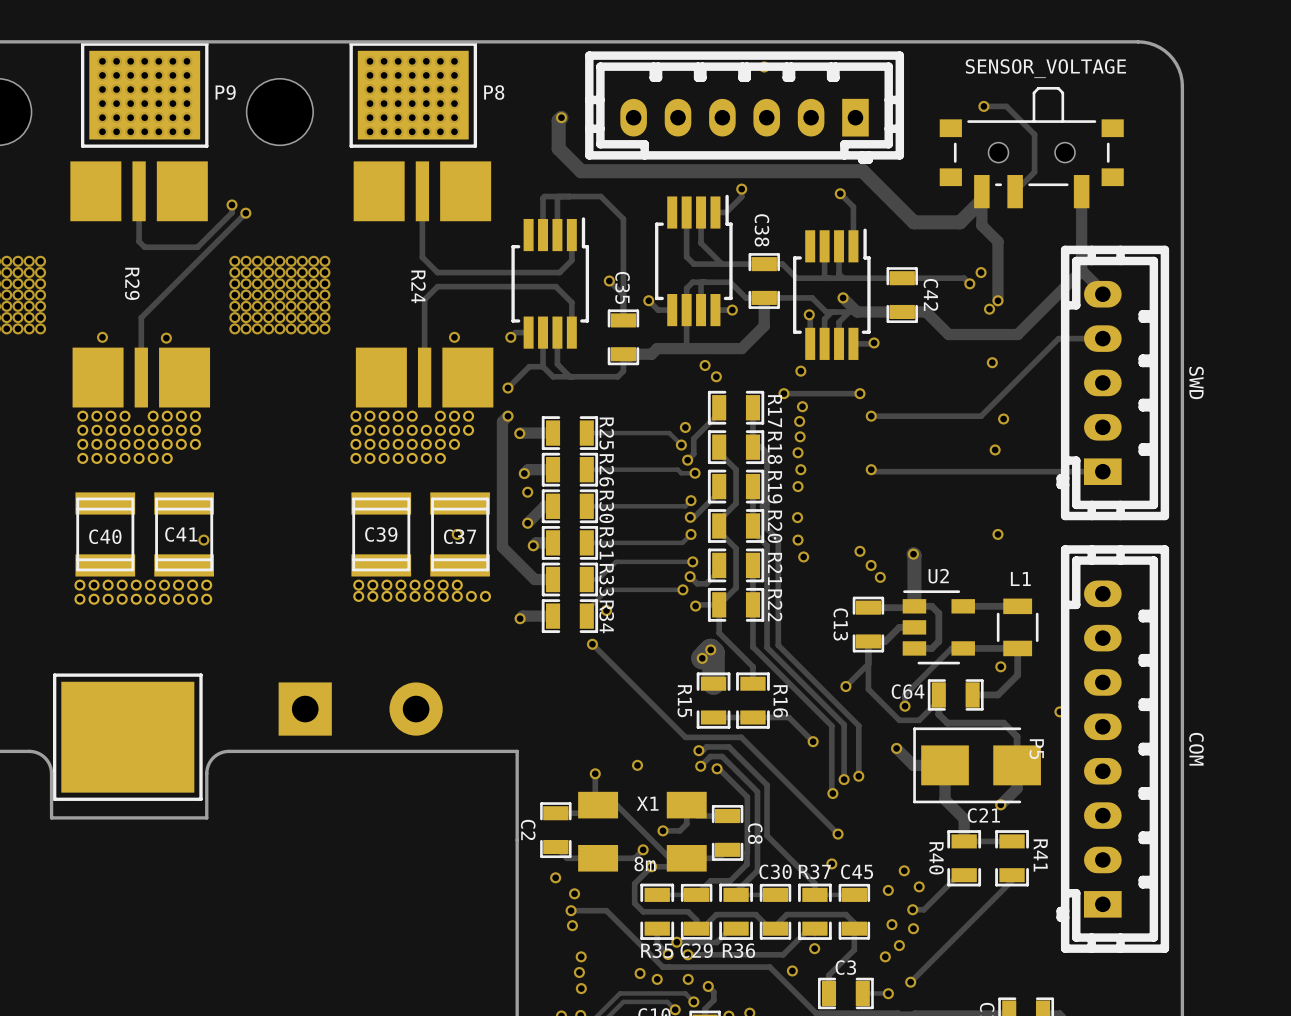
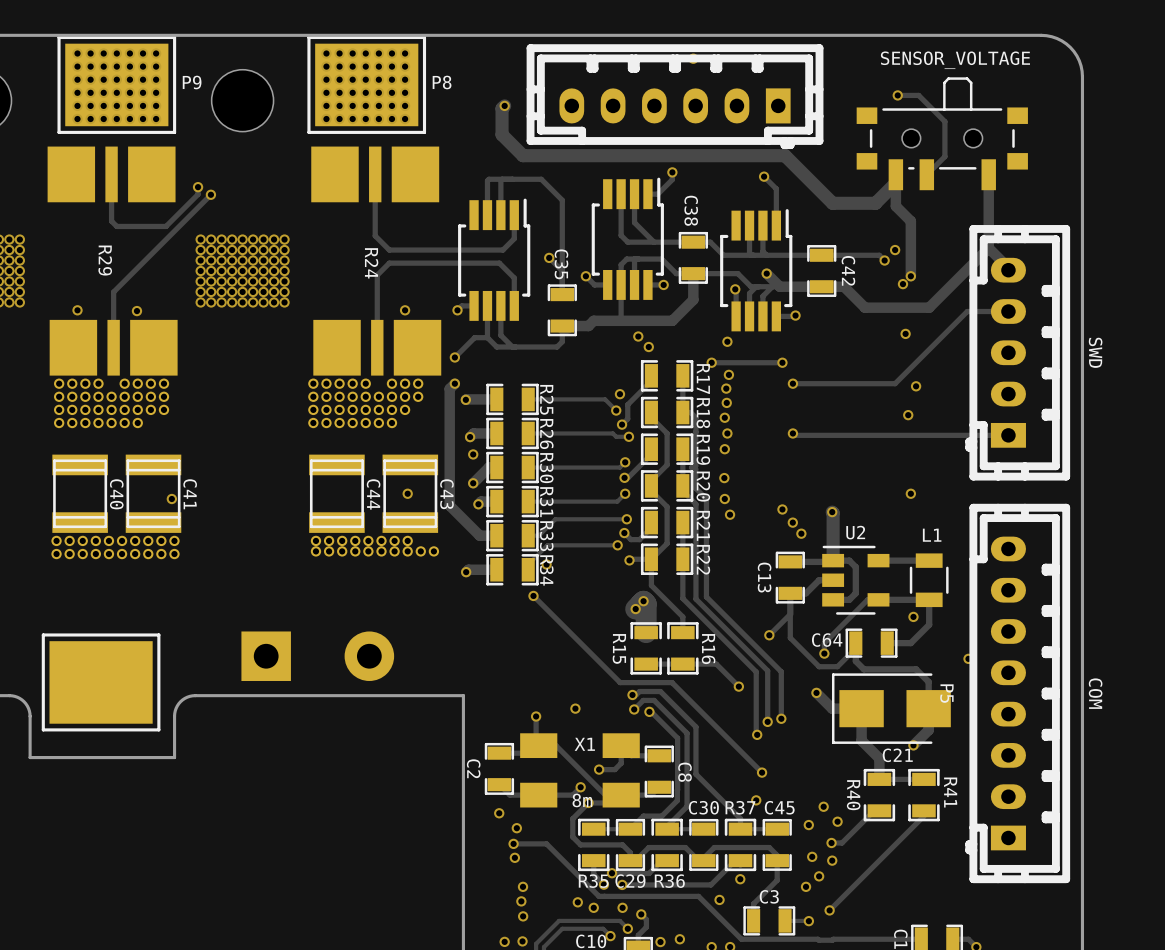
C41 name rotation: 0° (181, 534) -> 90° clockwise (190, 494)
C39 name: C39 (381, 534) -> C44 (373, 494)
C40 name rotation: 0° (105, 536) -> 90° clockwise (116, 494)
C37 name: C37 (460, 536) -> C43 (446, 494)
part footprint: [52, 673, 203, 801] -> [41, 633, 161, 732]

